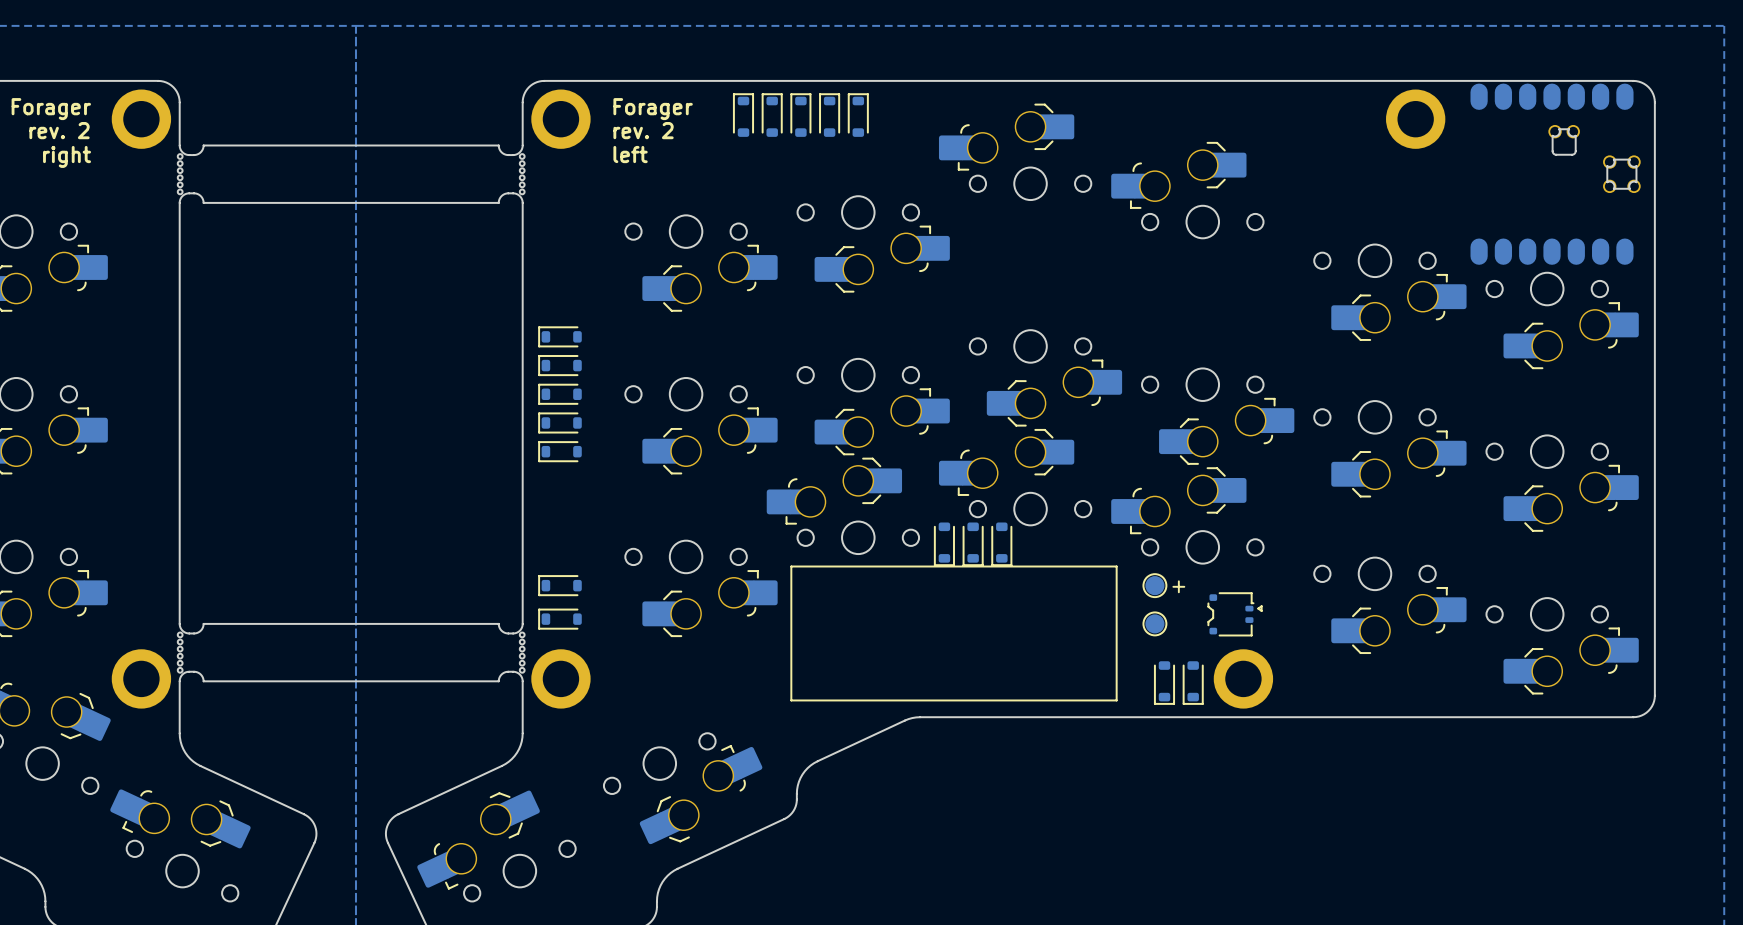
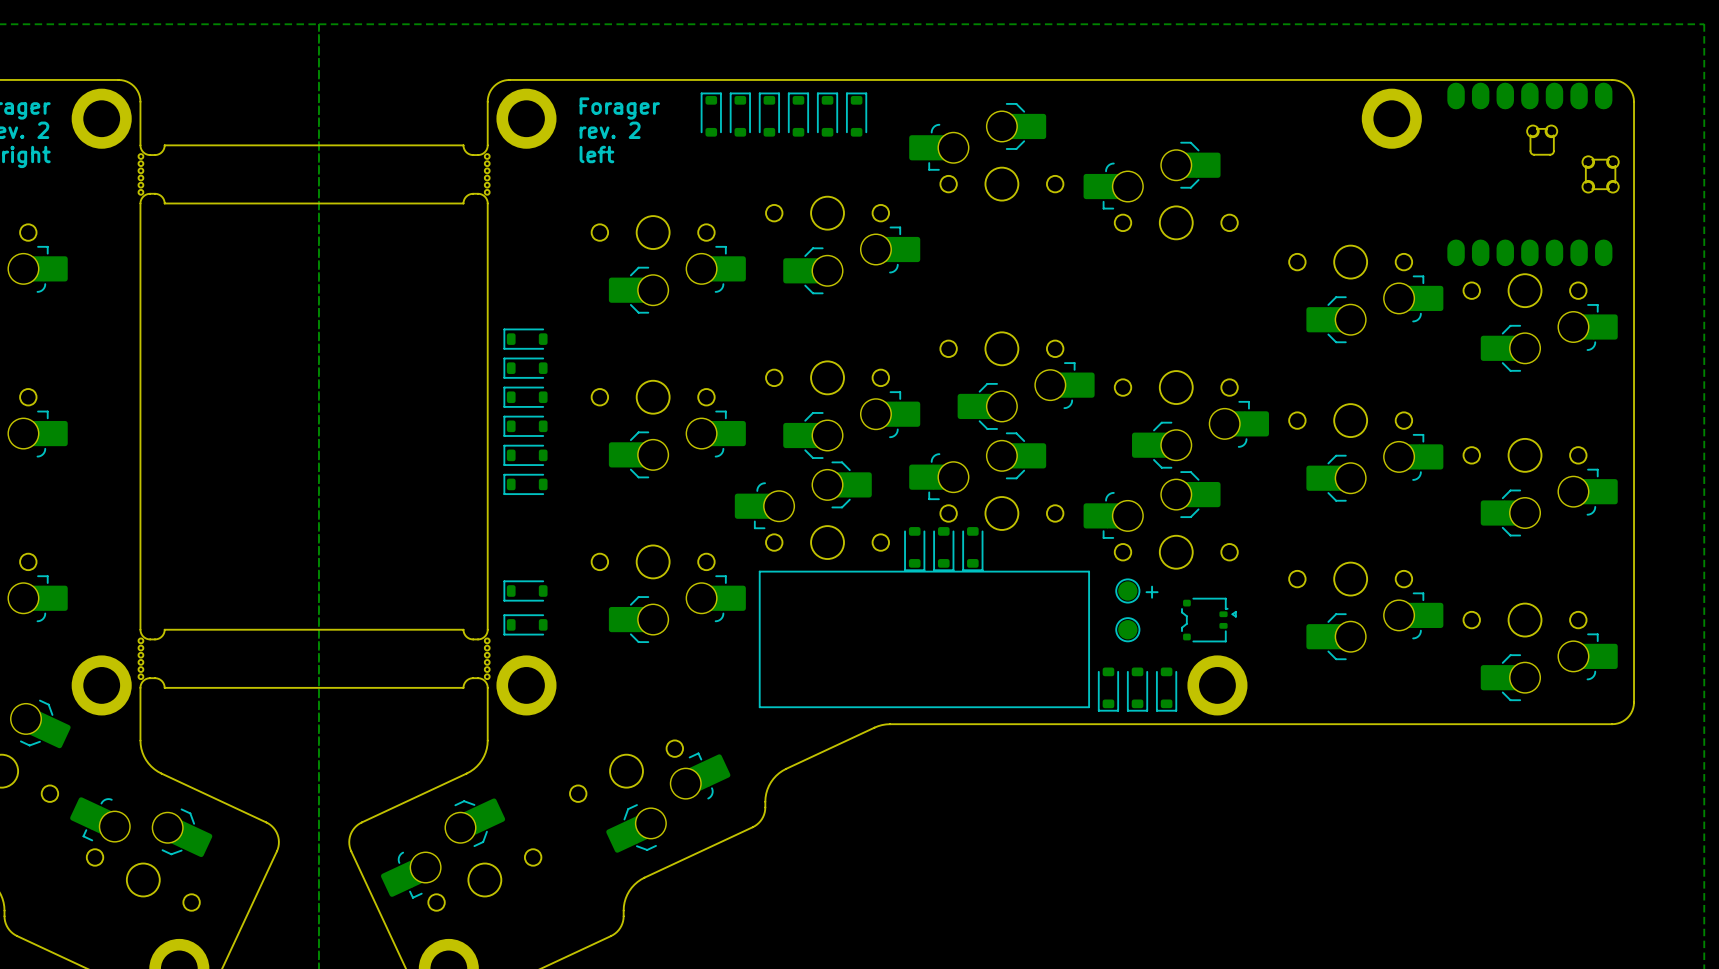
part: none -> (856, 114)
part: none -> (525, 484)
part: none -> (1108, 689)

